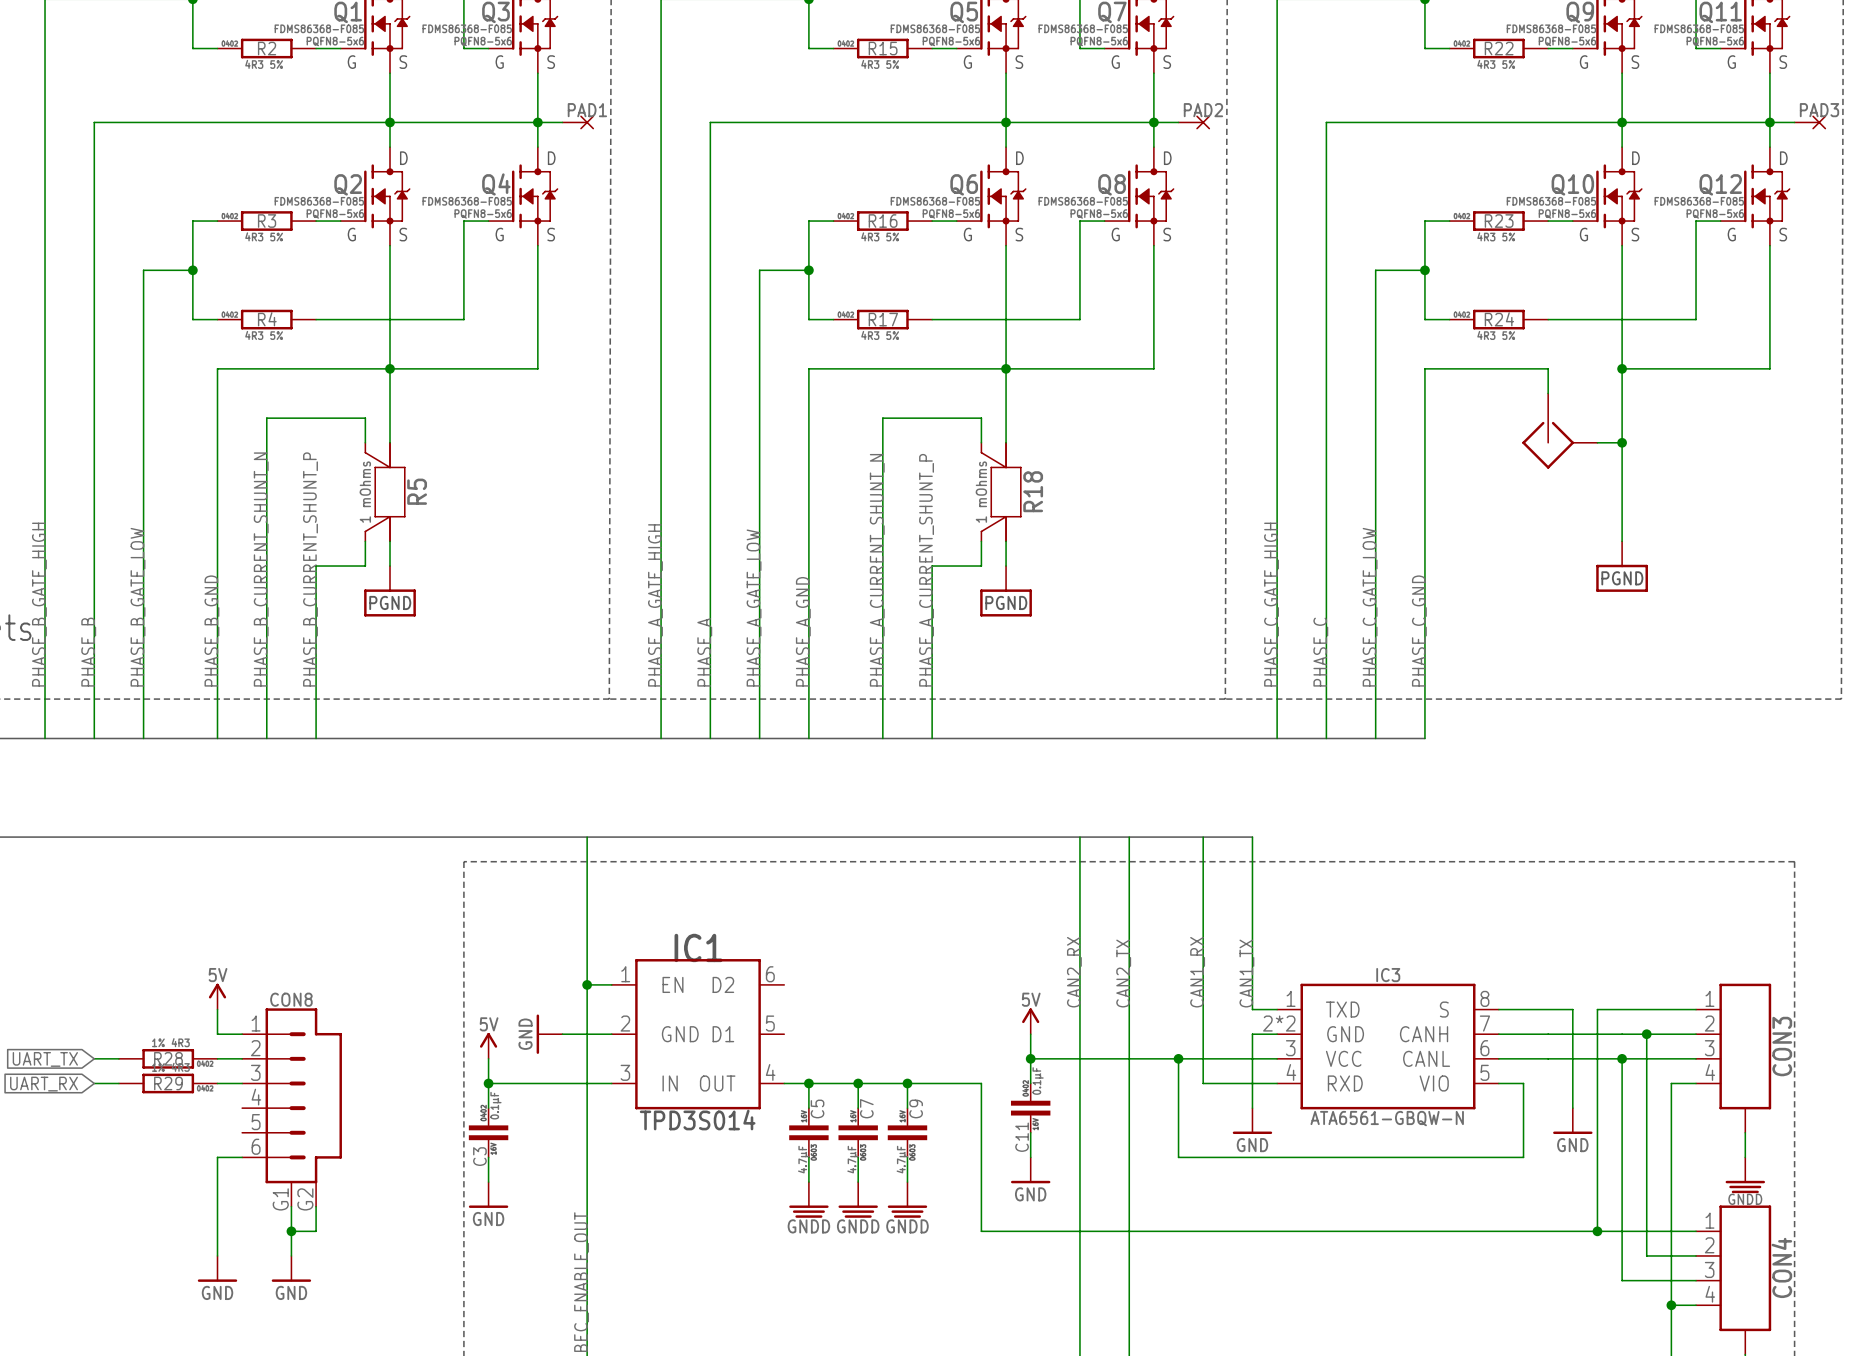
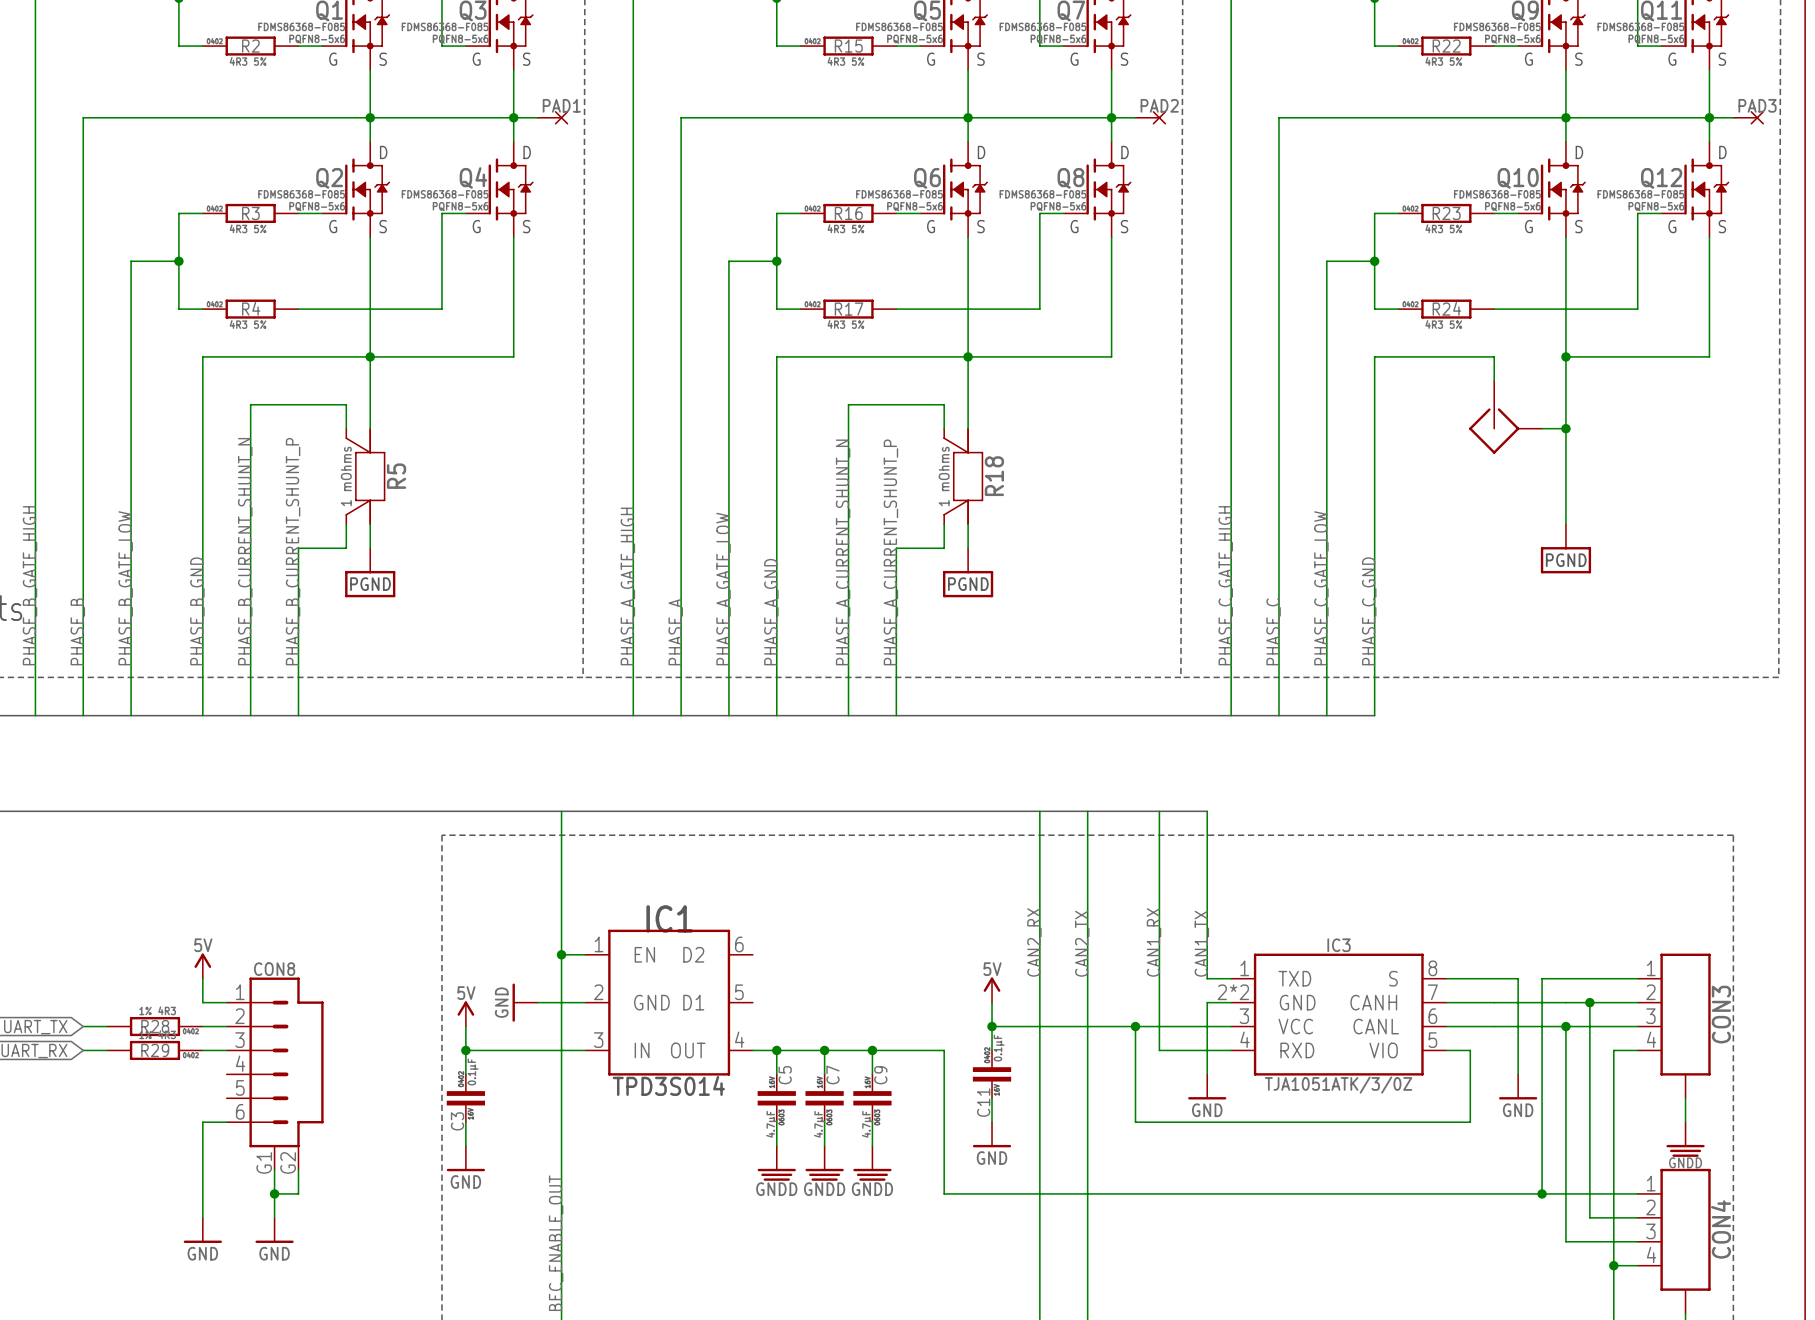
IC3 text: ATA6561-GBQW-N (1387, 1118) -> TJA1051ATK/3/0Z (1338, 1085)

